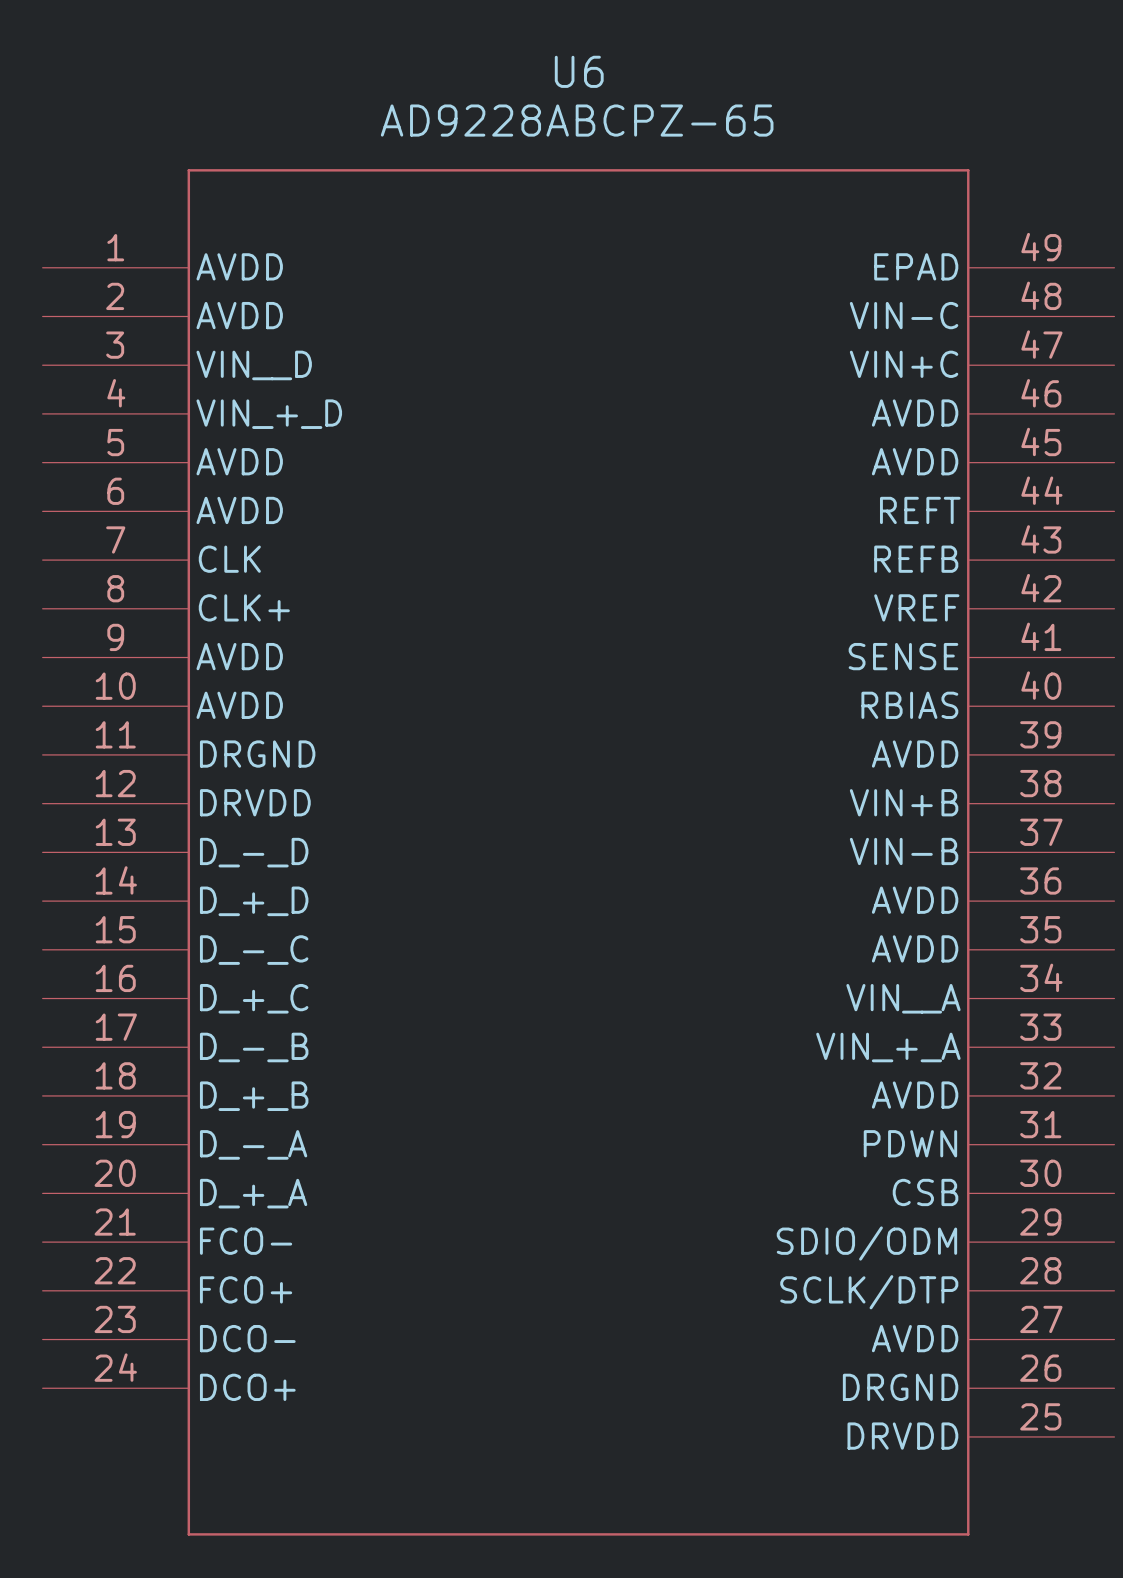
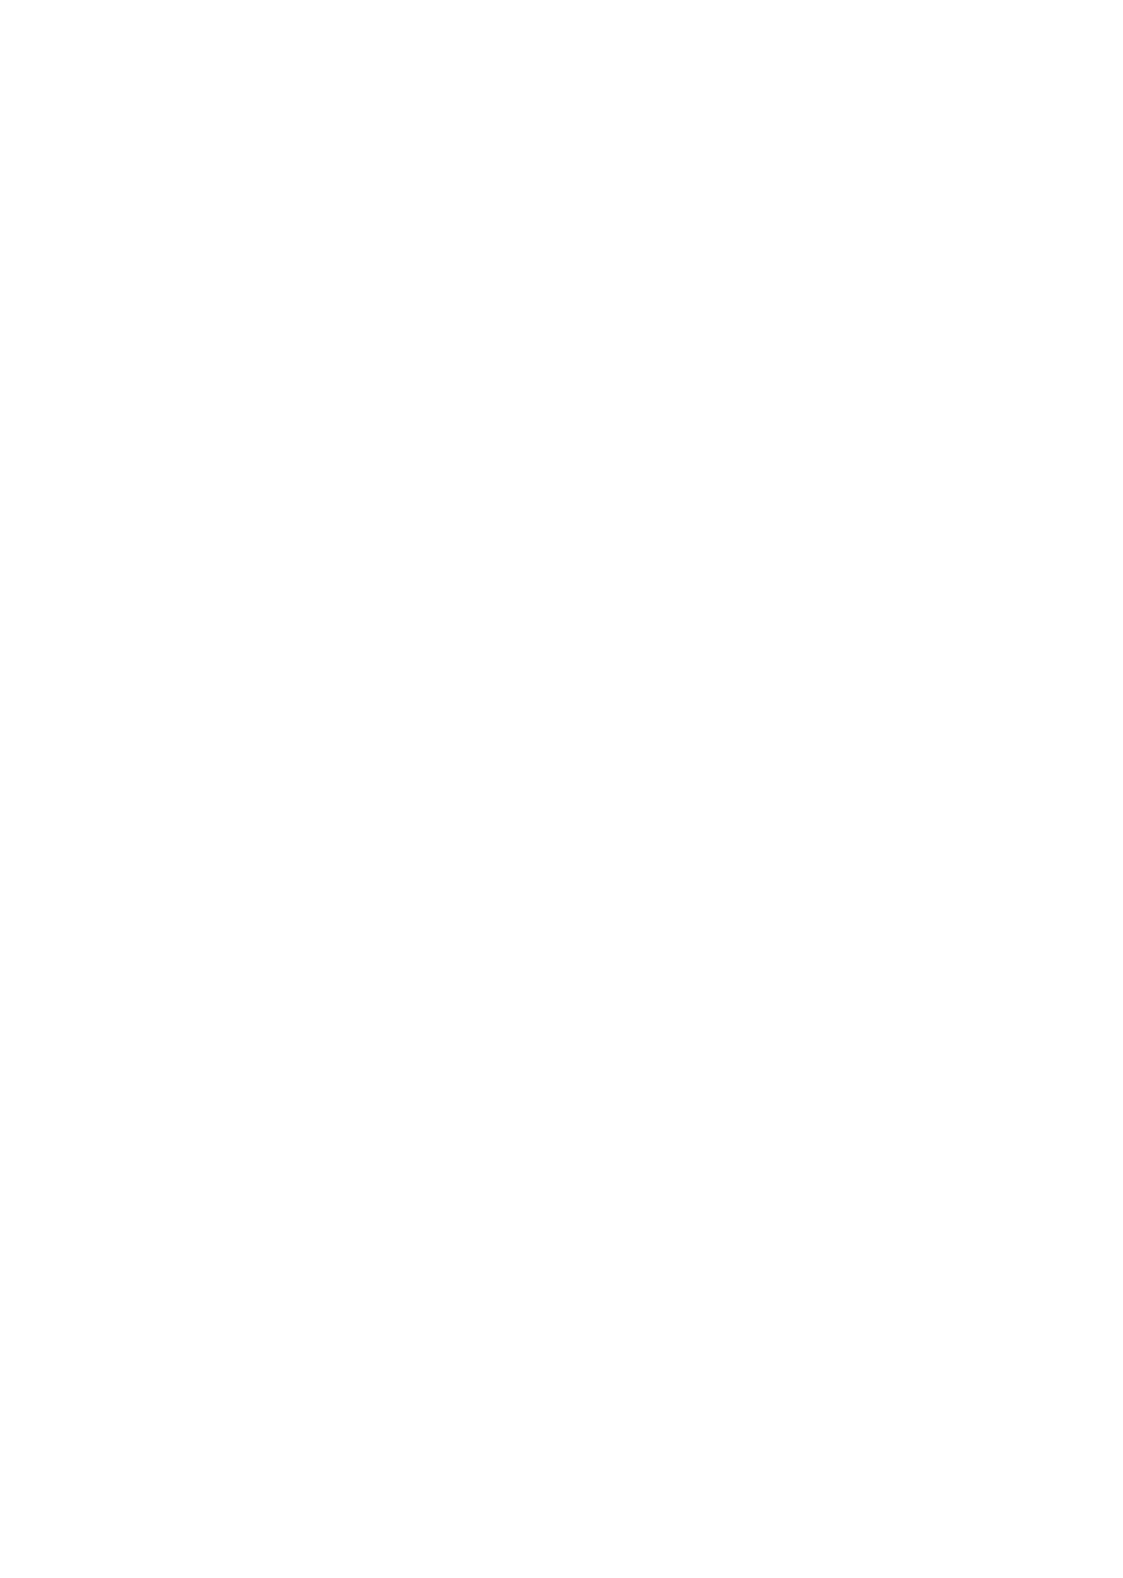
U6: AD9228ABCPZ-65 (578, 852) -> none

